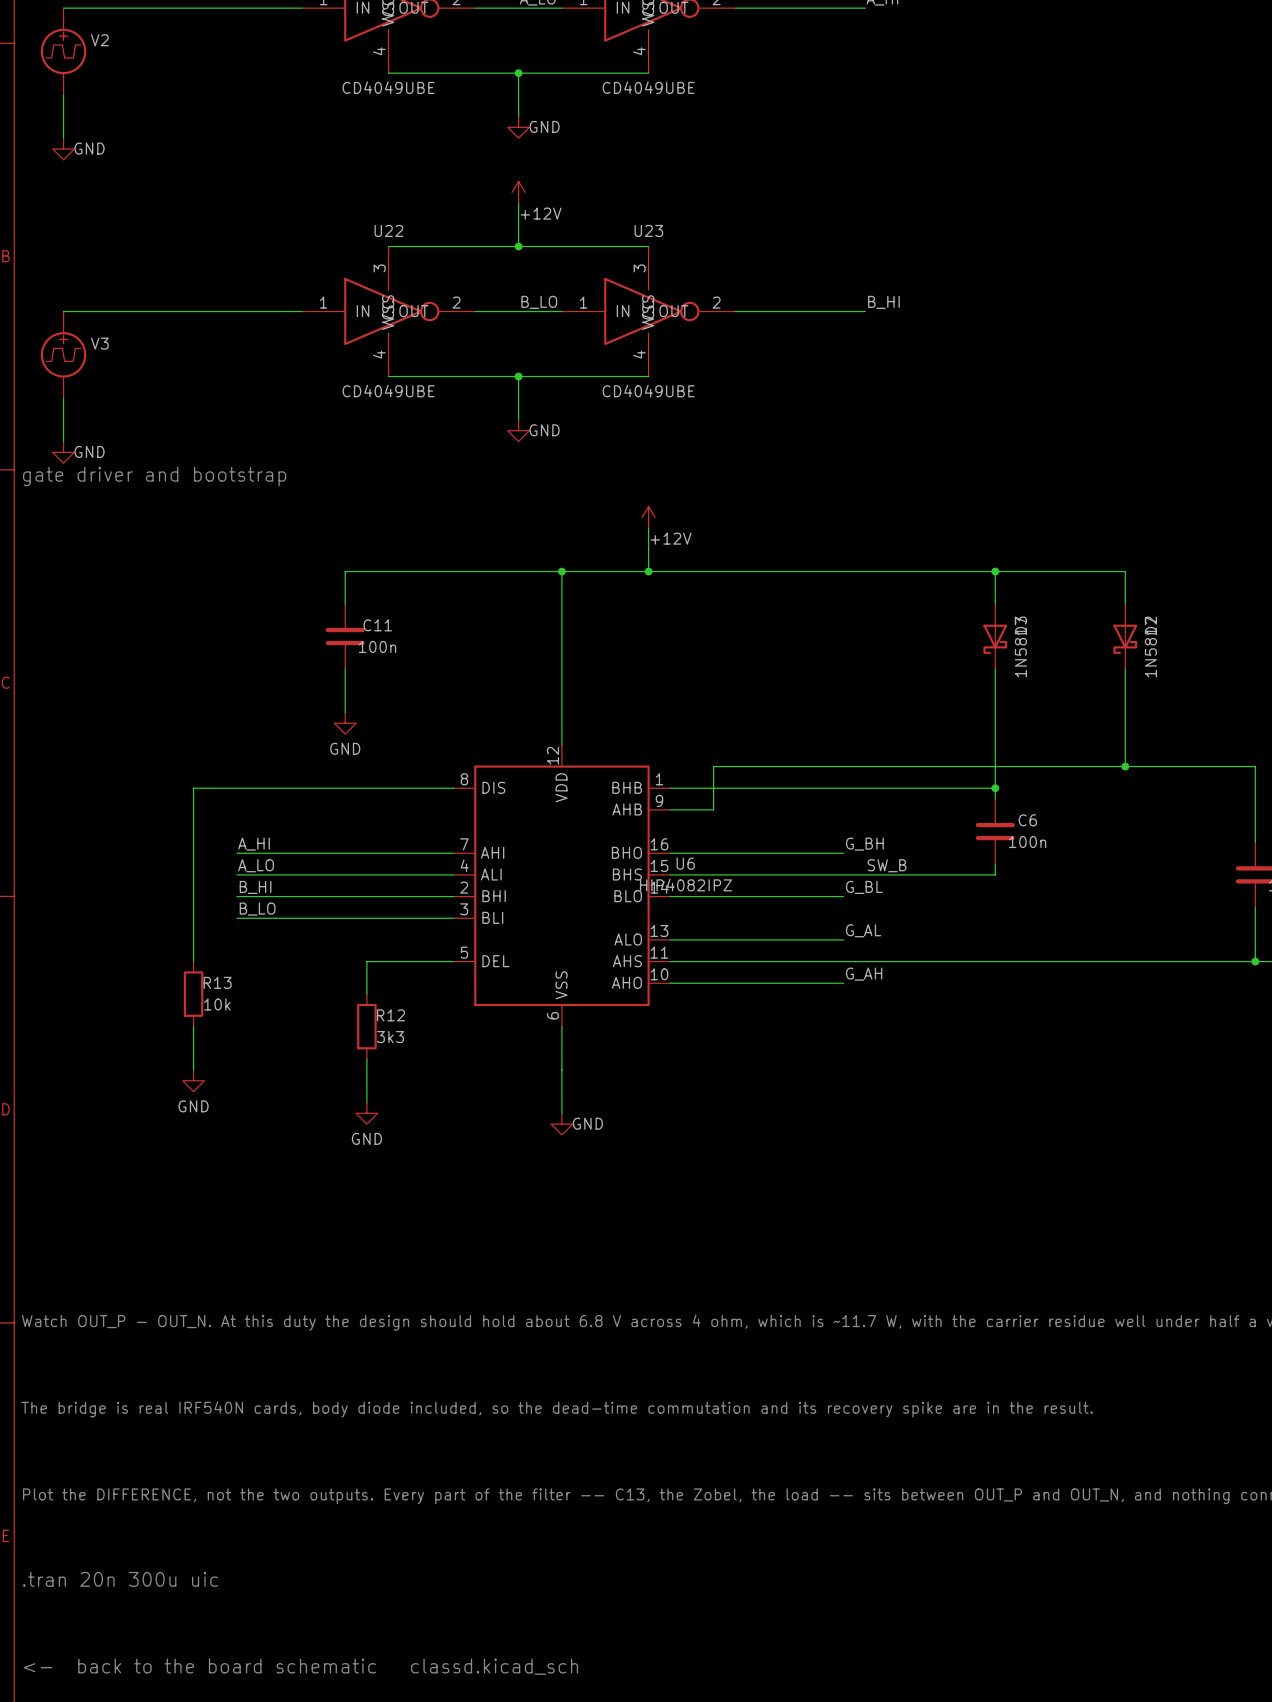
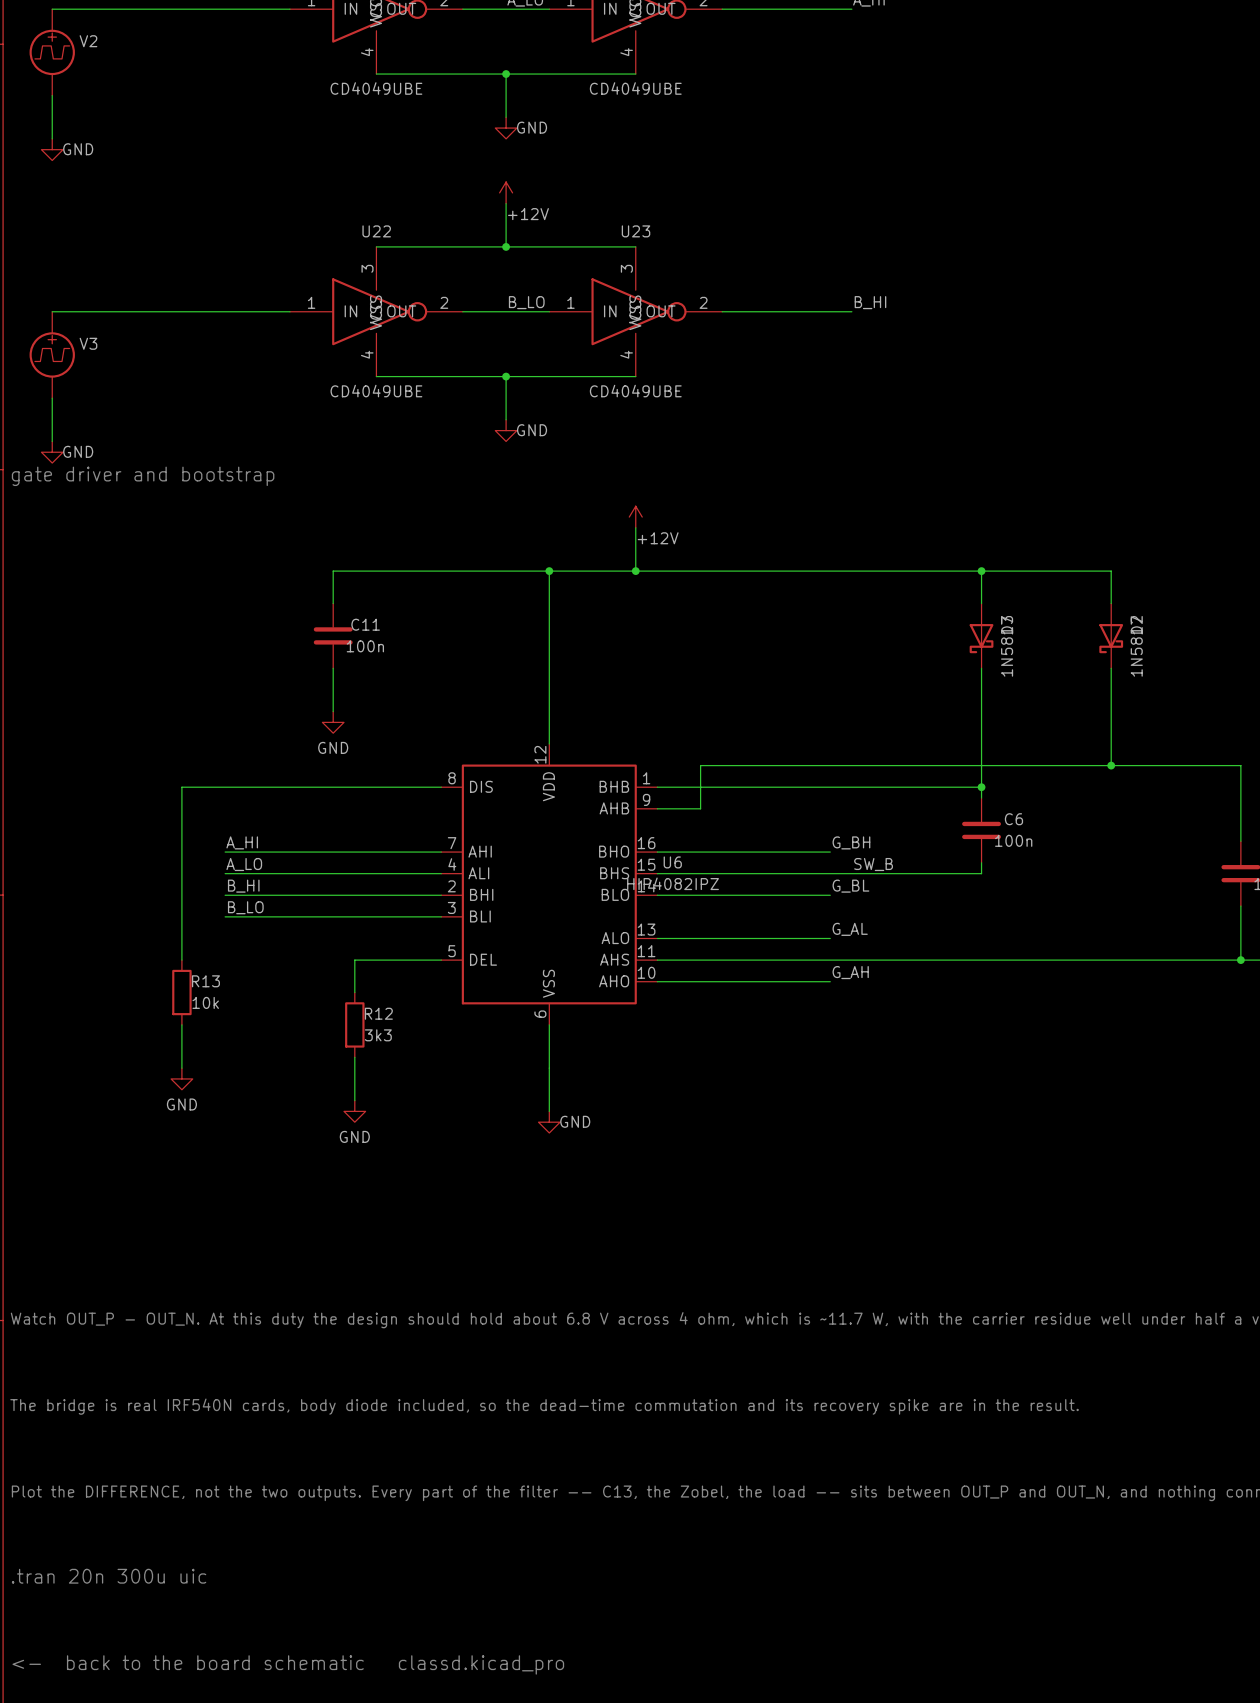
text: <- back to the board schematic classd.kicad_sch (300, 1666) -> <- back to the board schematic classd.kicad_pro (288, 1664)

